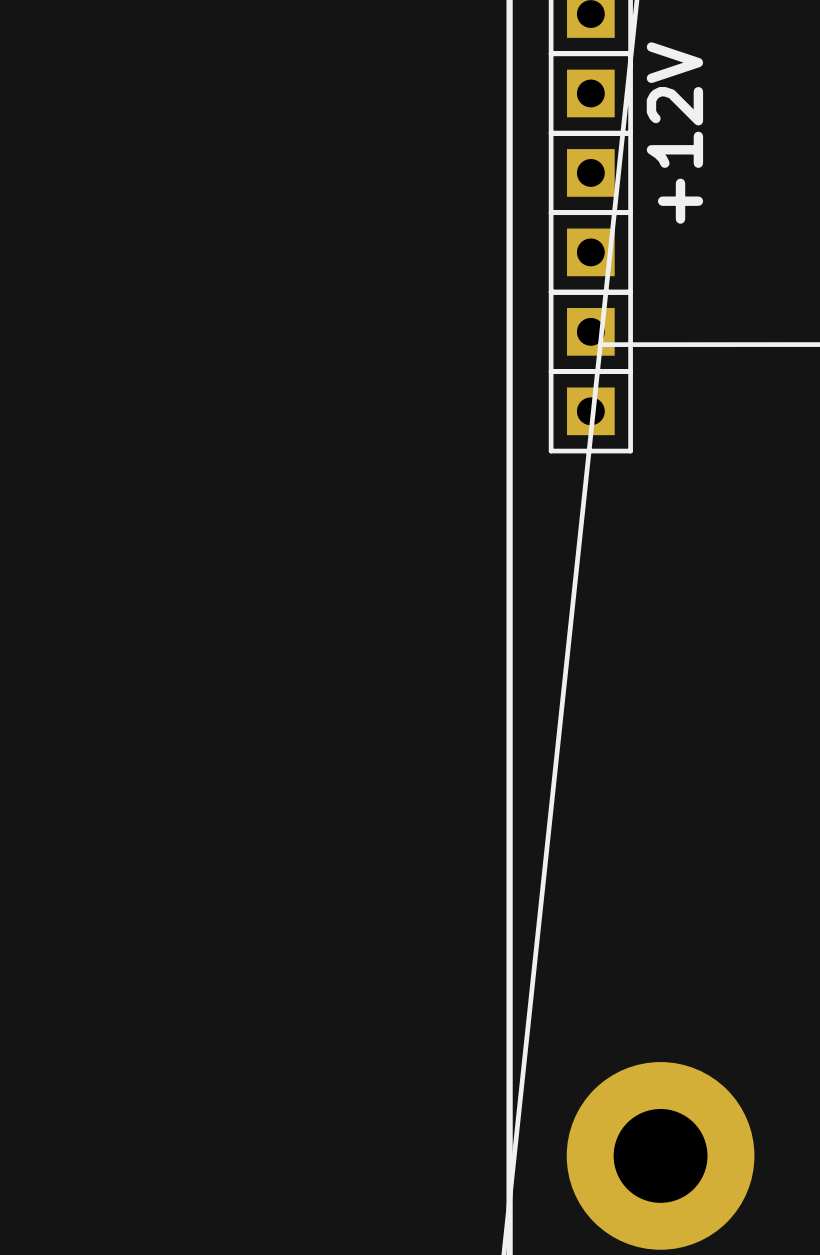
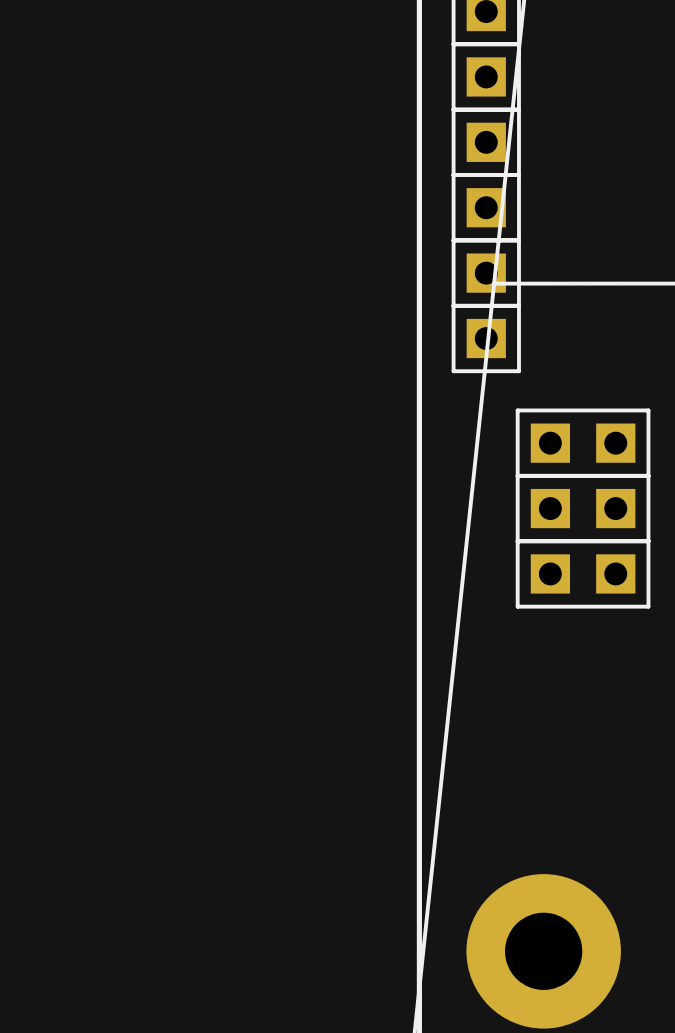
text: +12V (674, 133) -> none
part: none -> (583, 443)
part: none -> (583, 508)
part: none -> (583, 573)

